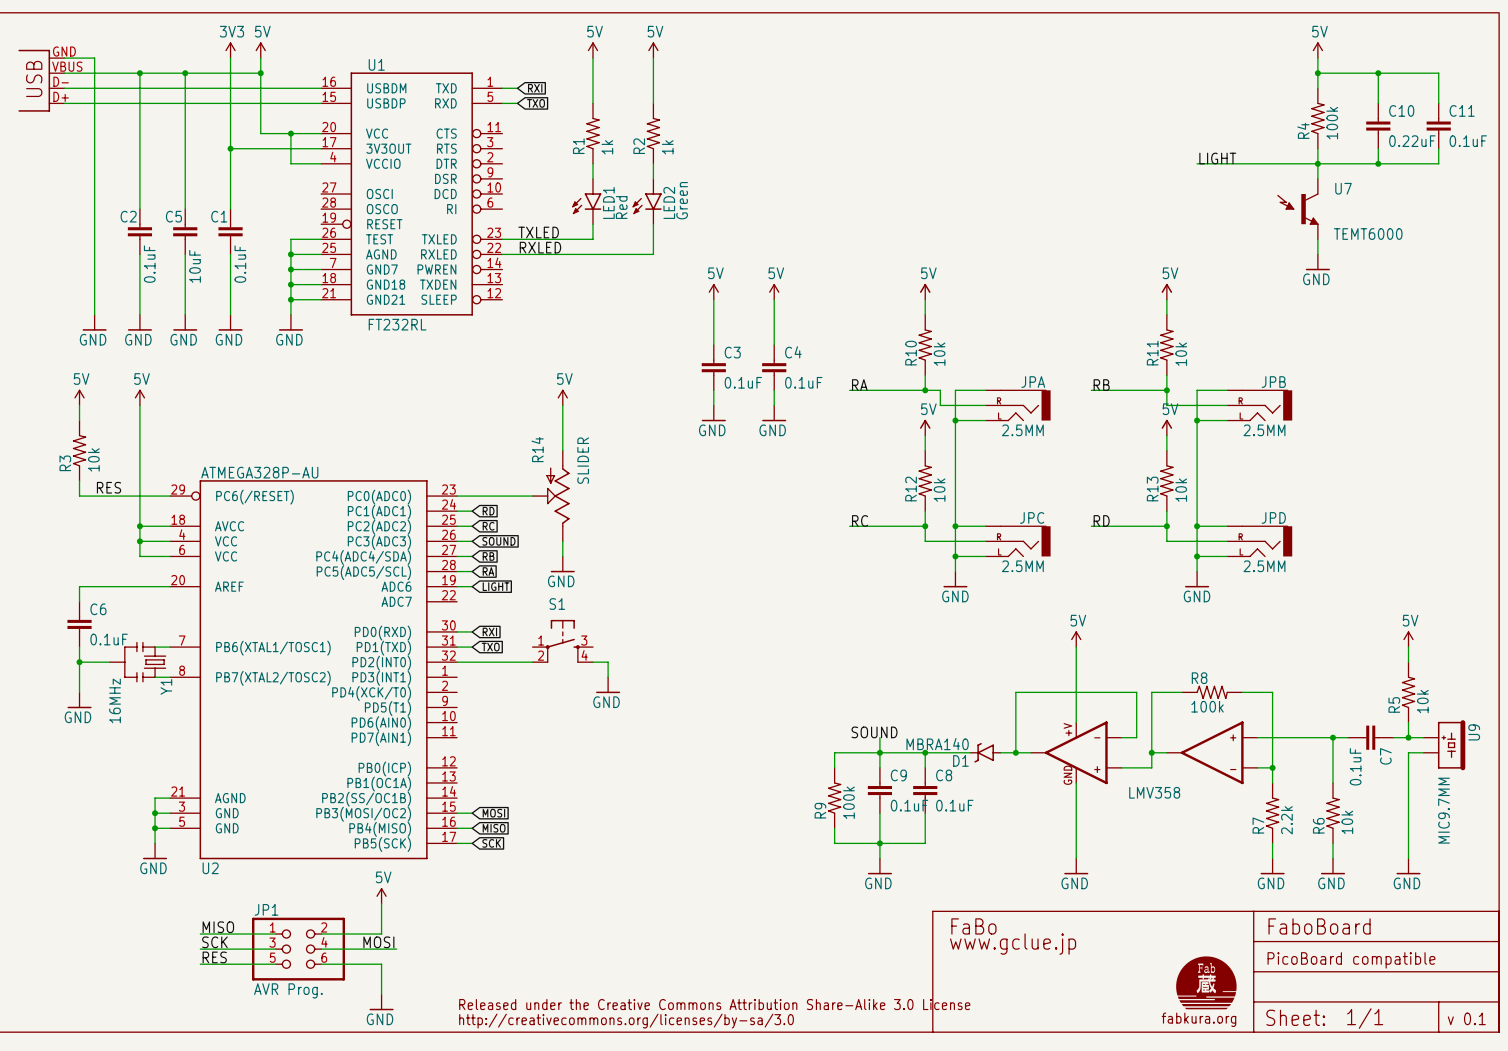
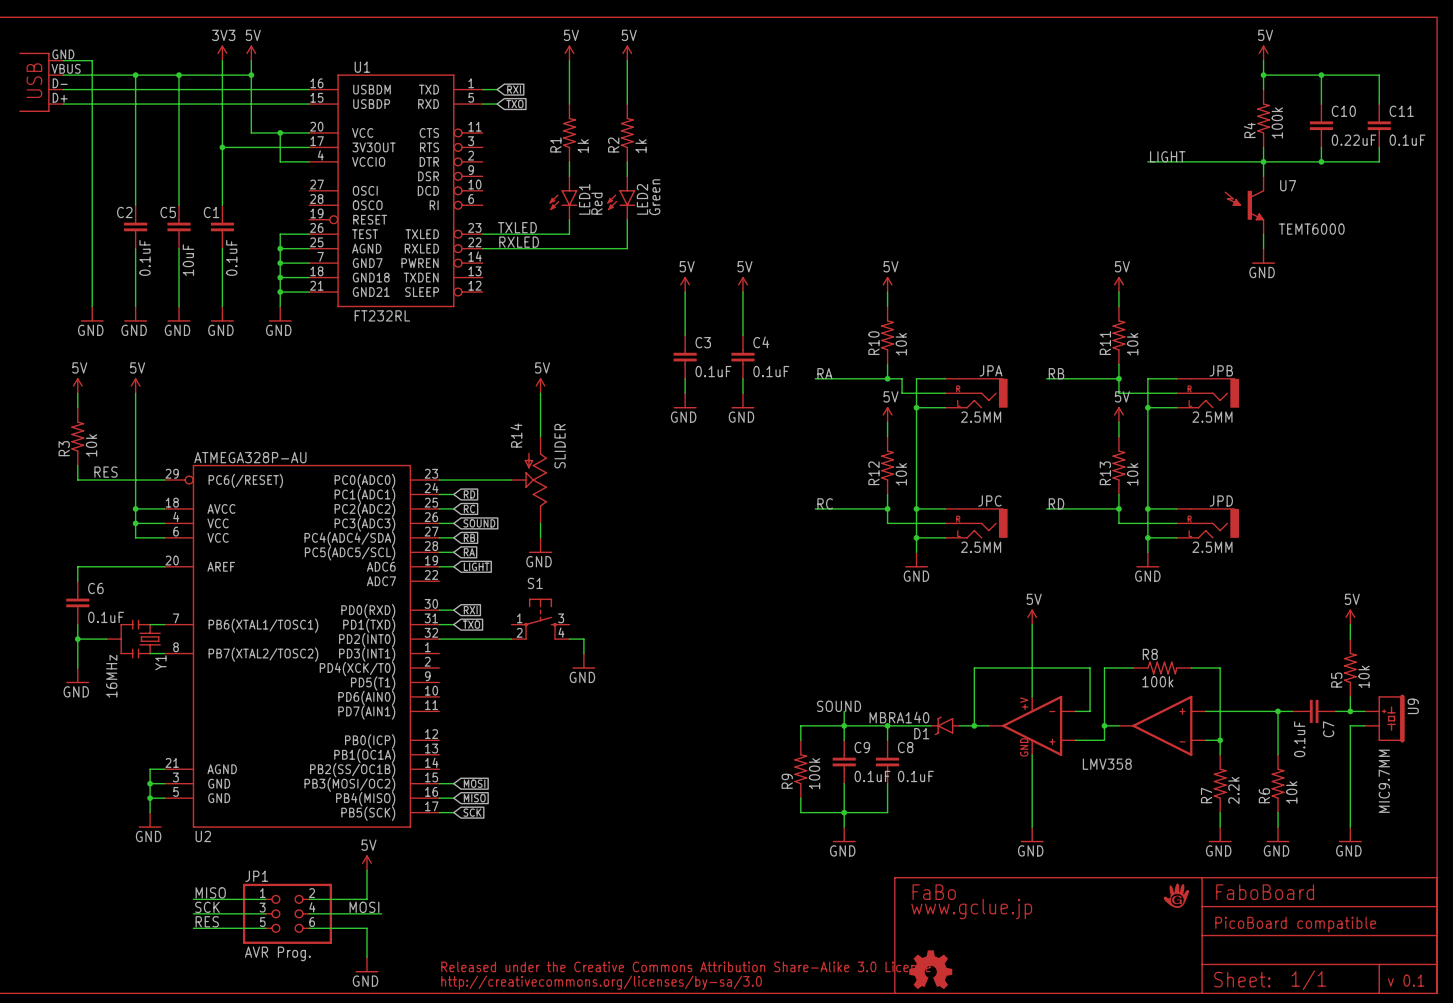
part: none -> (1176, 895)
part: (1206, 982) -> none
part: none -> (930, 969)
text: fabkura.org (1198, 1019) -> none

